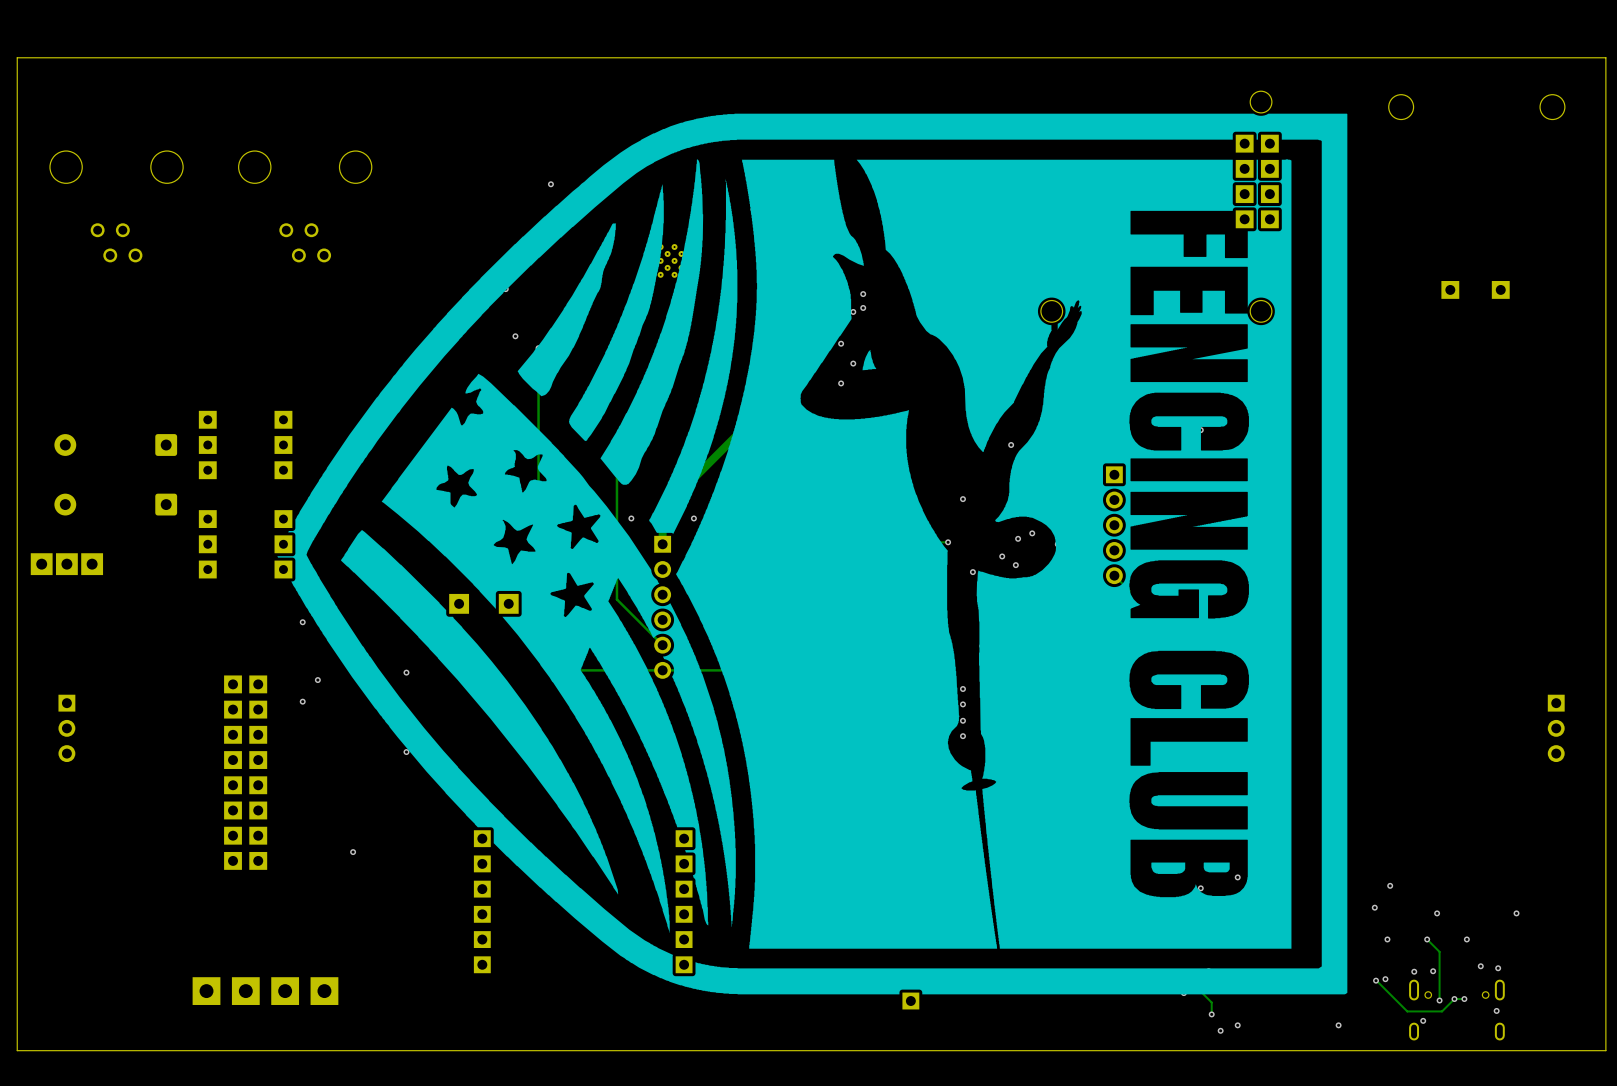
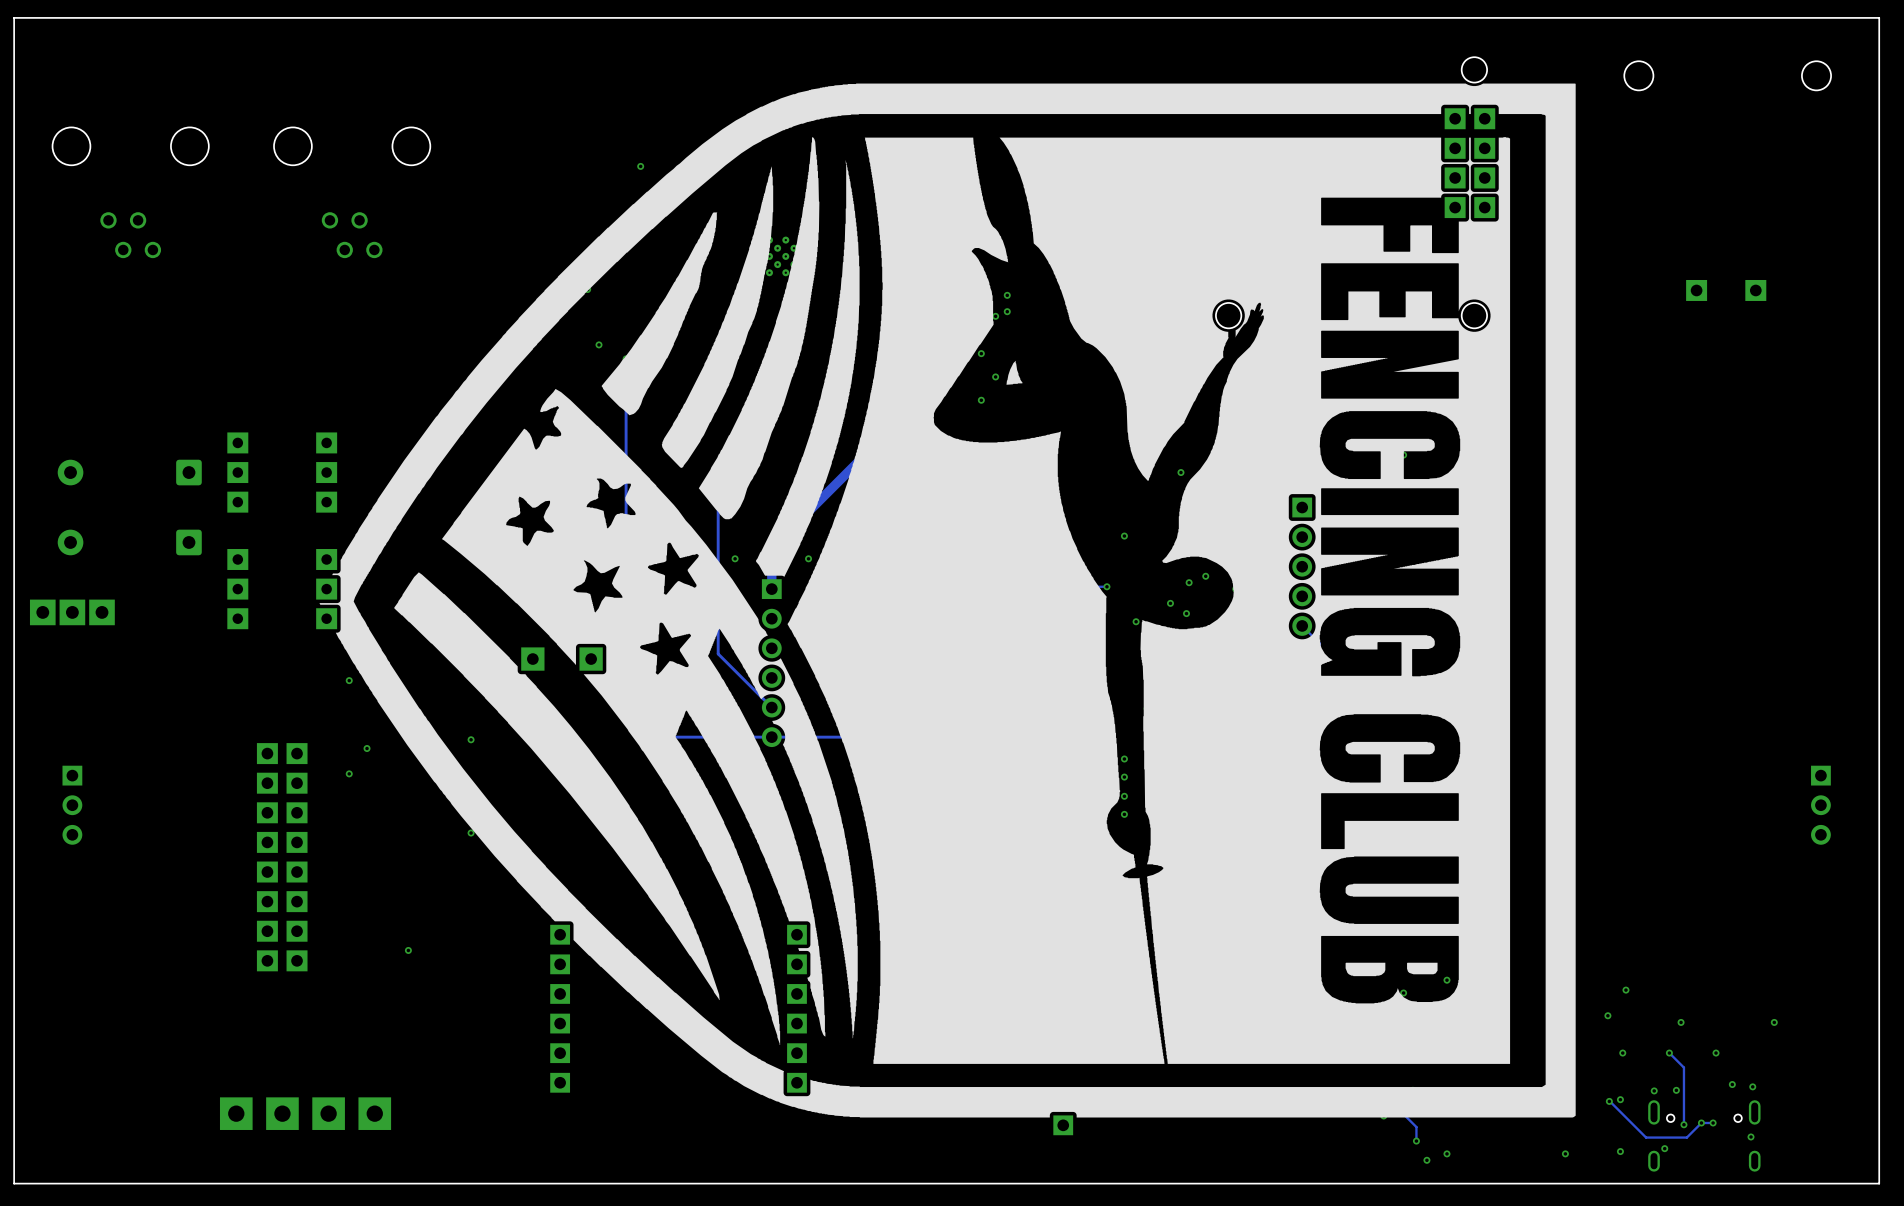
via: none -> (1620, 1151)

